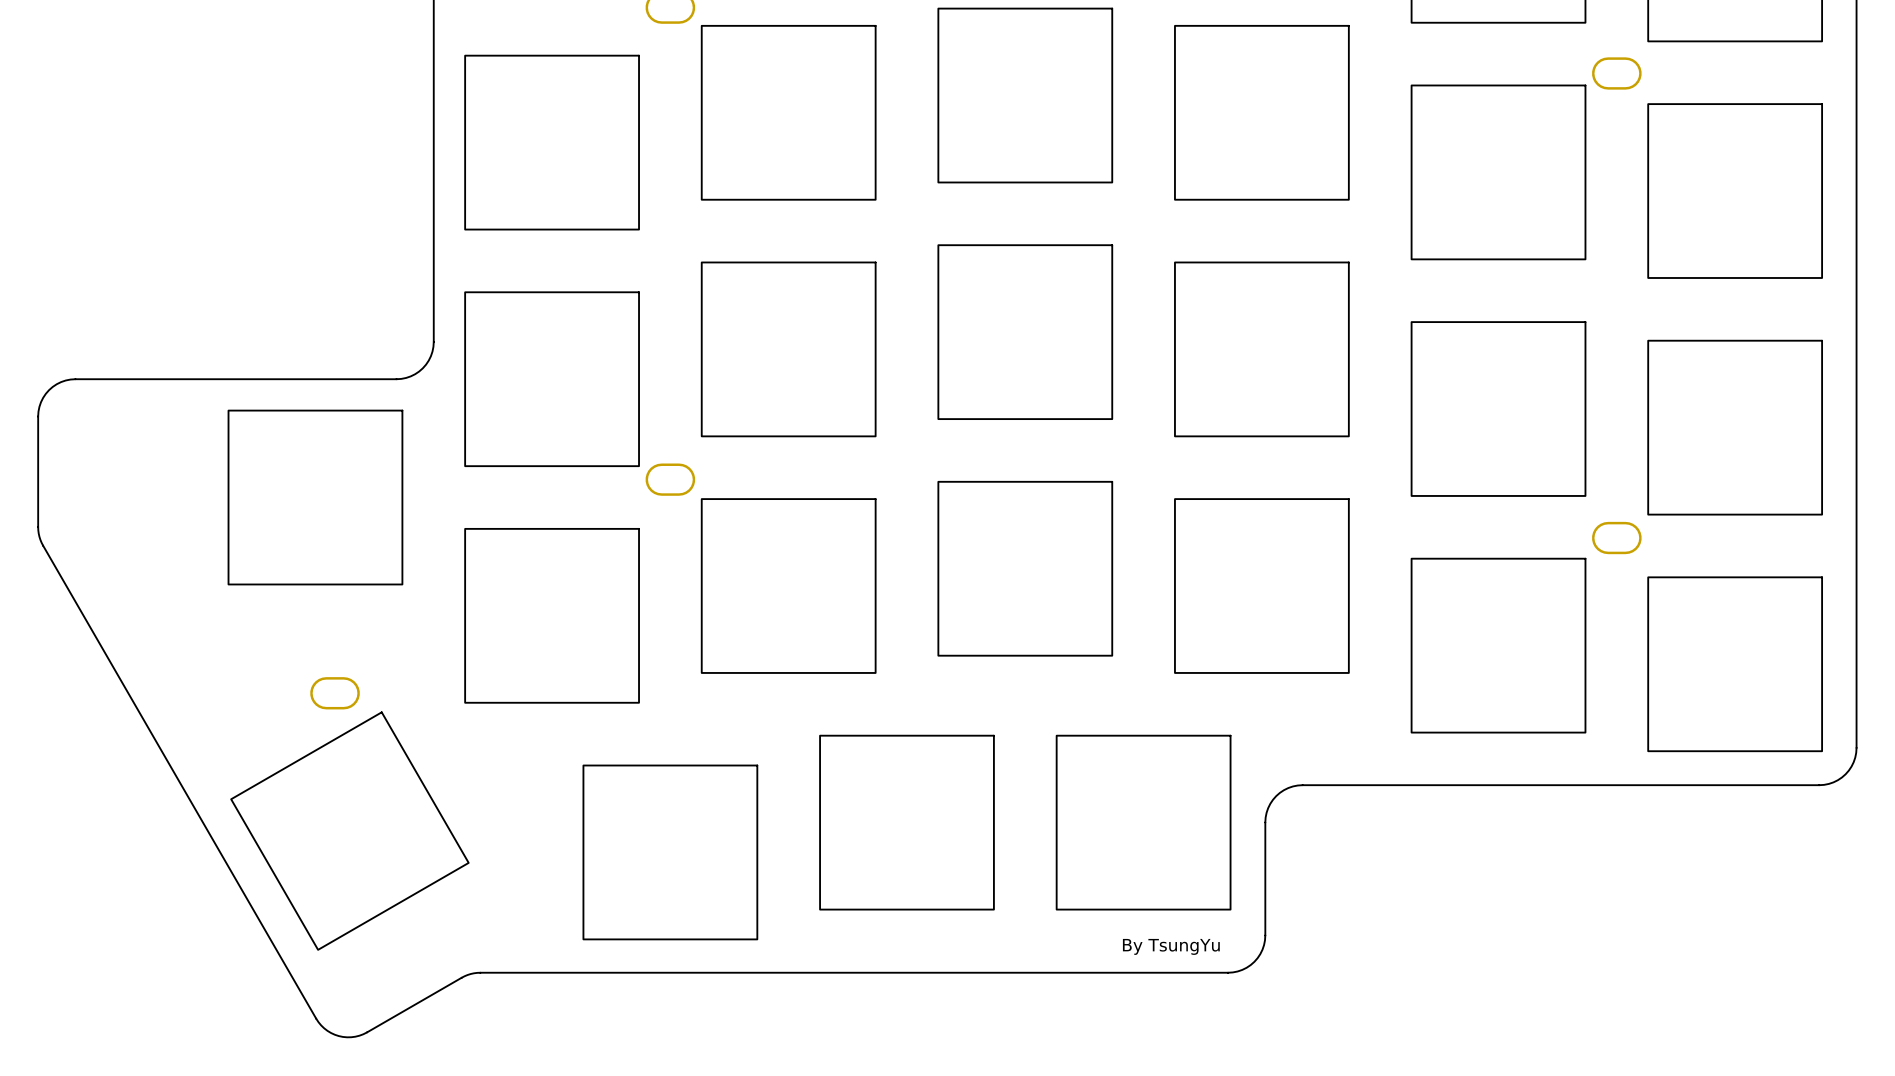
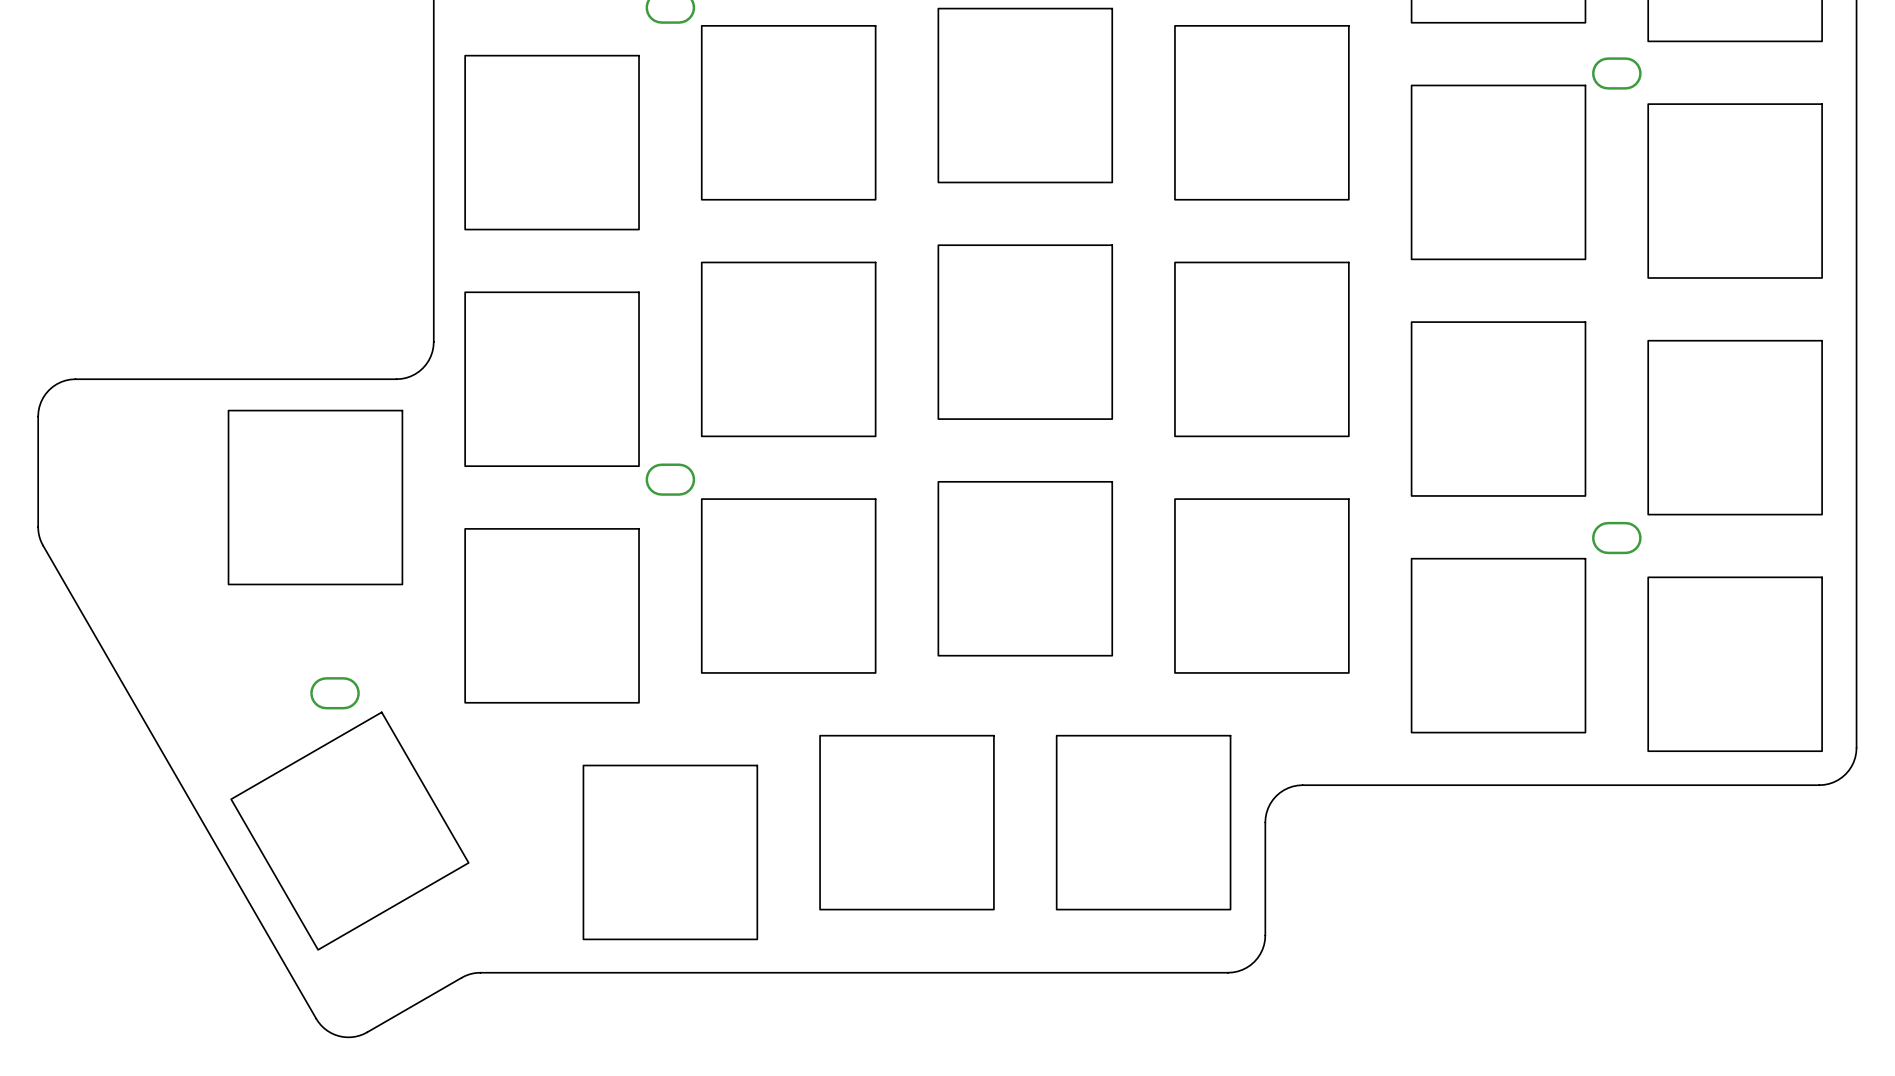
text: By TsungYu (1171, 946) -> none

